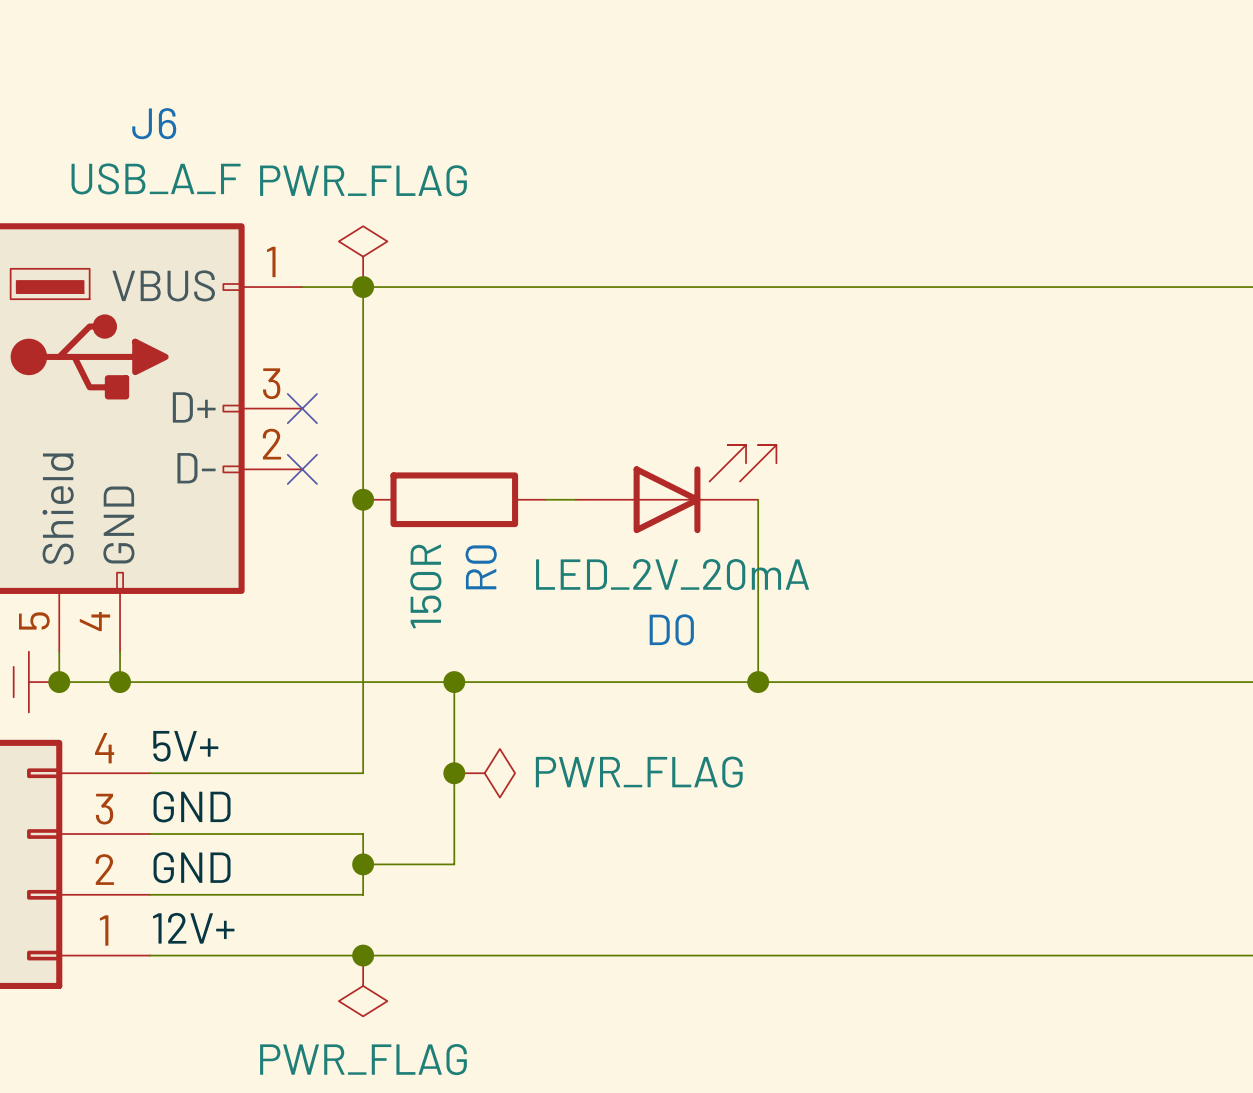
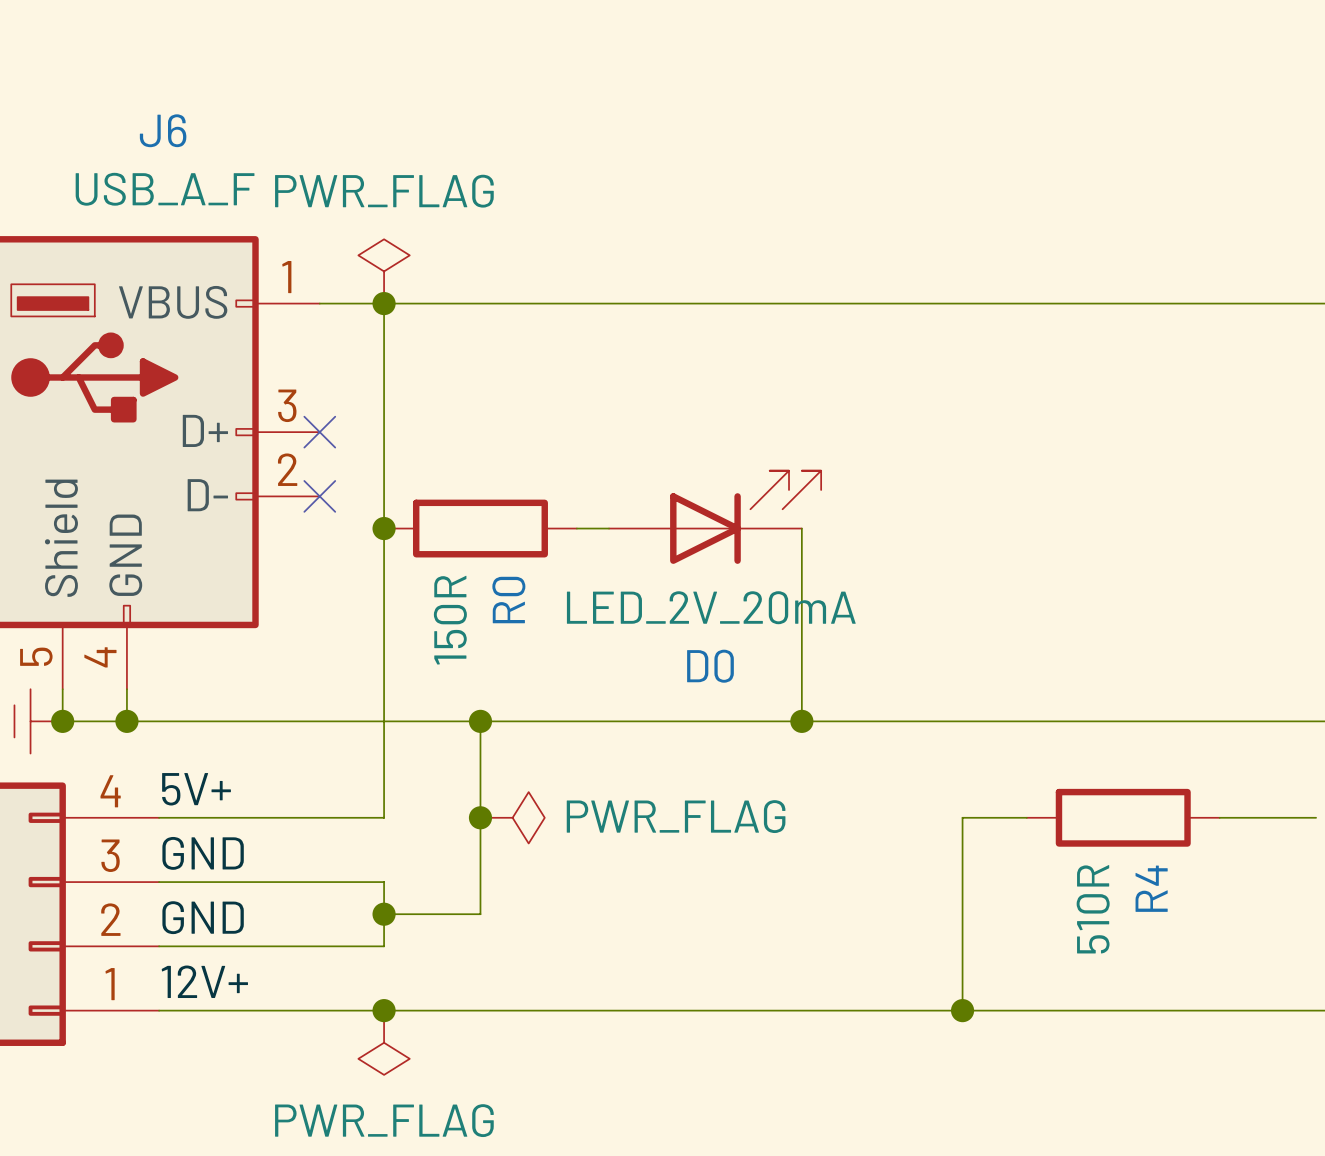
wire: none -> (1026, 817) (962, 817) (962, 1010)
R4: none -> 510R (1123, 817)
wire: none -> (1219, 817) (1316, 817)
junction: none -> (962, 1010)

